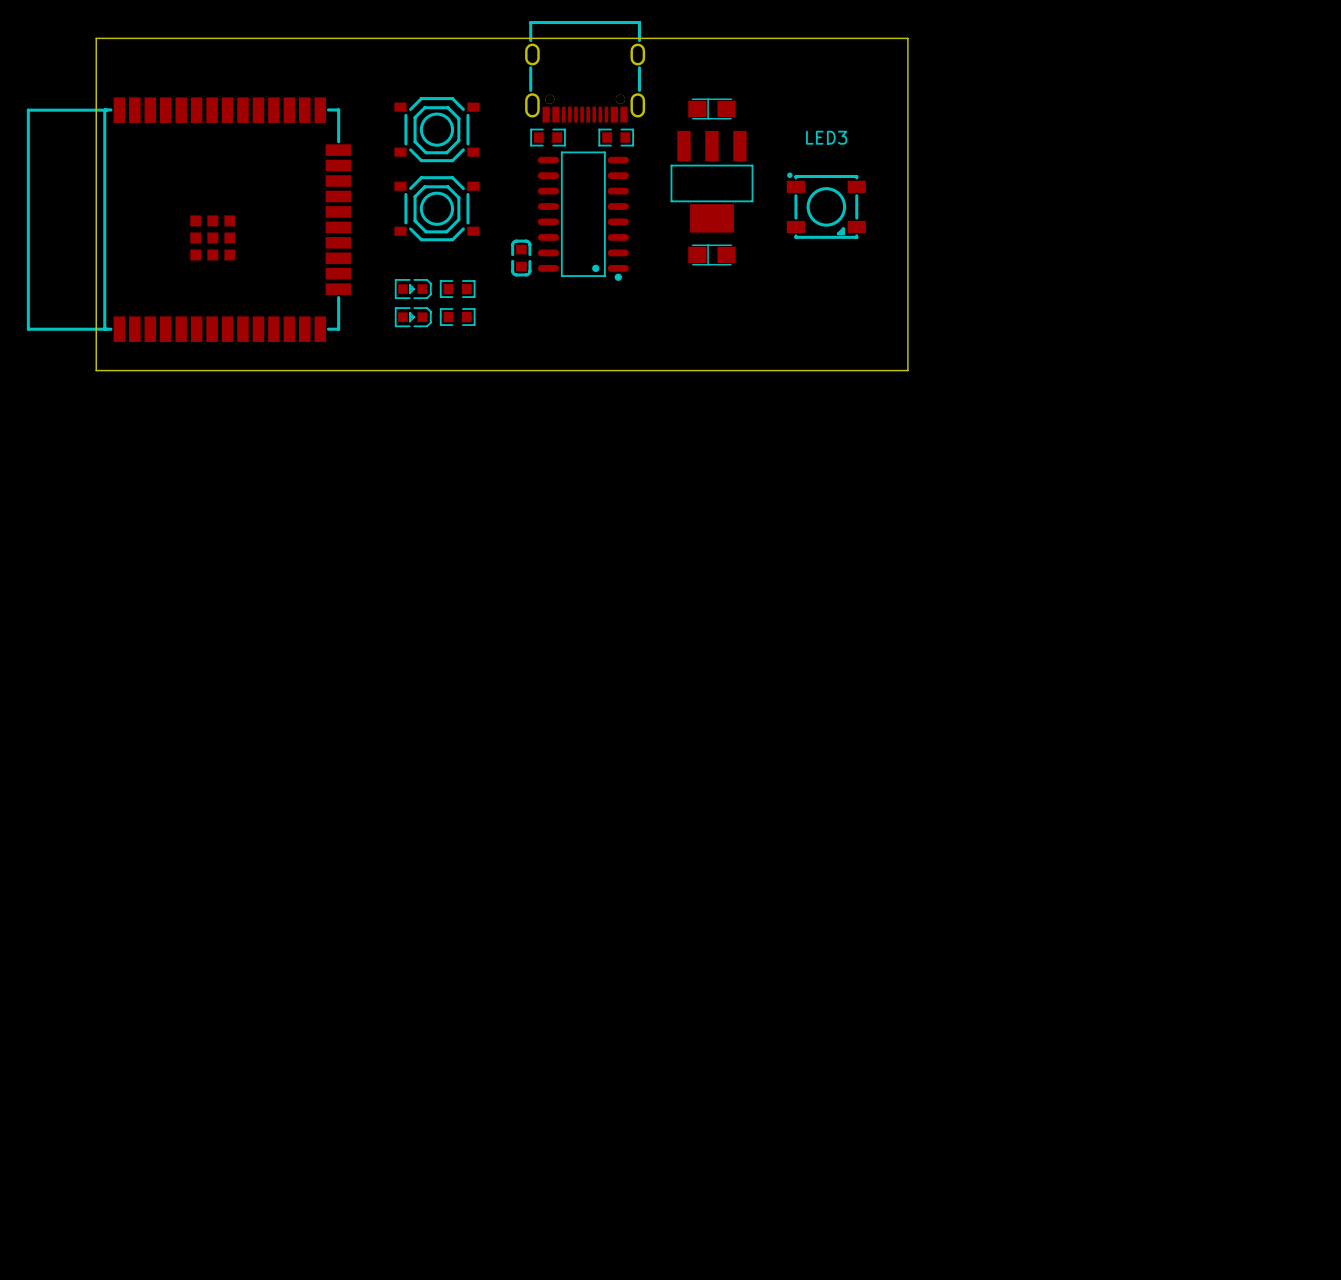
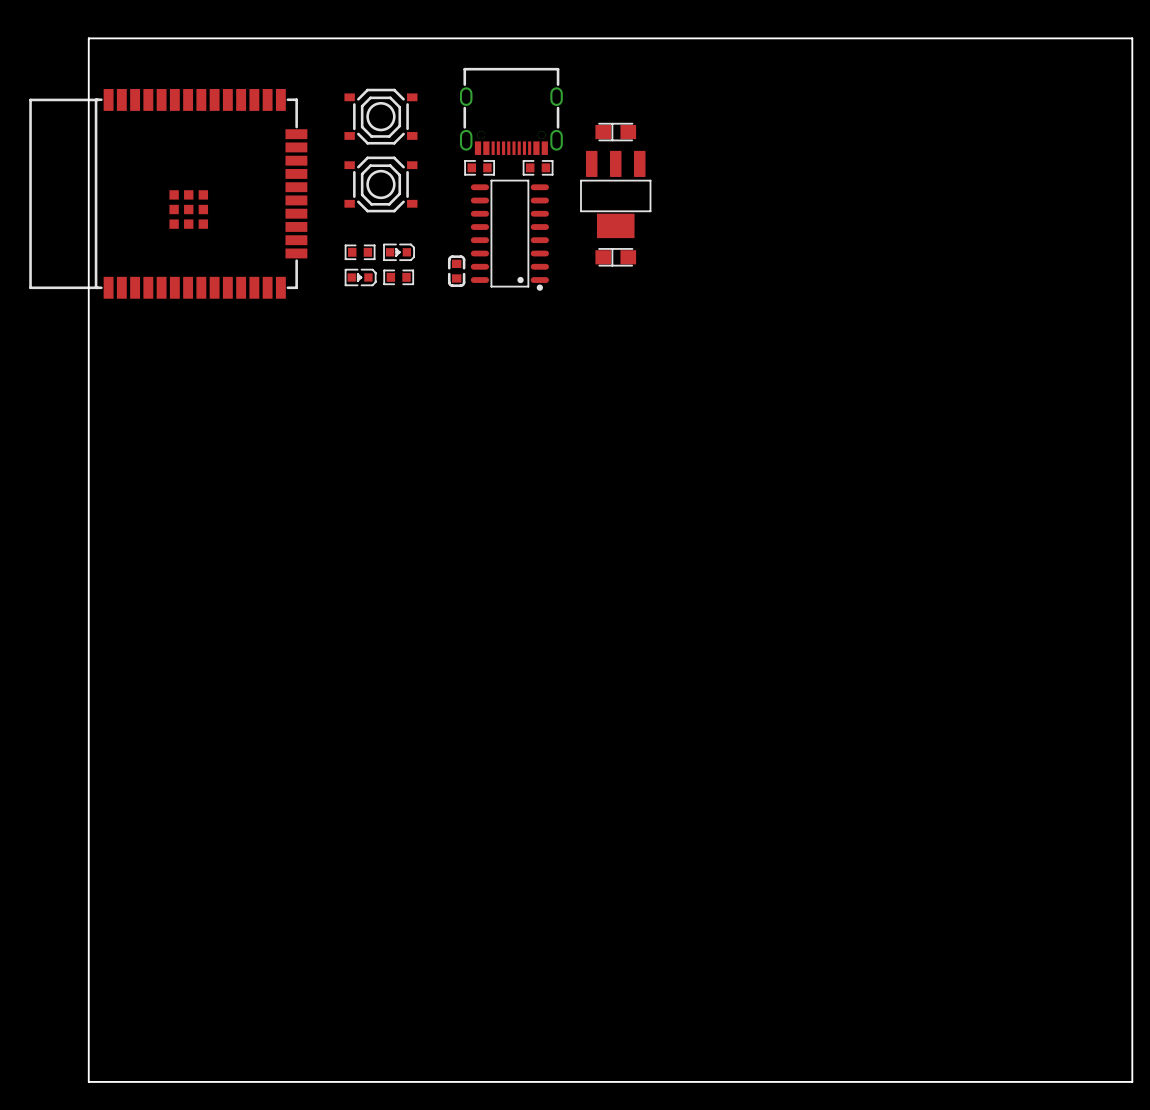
board edge: (907, 38) (907, 370) (96, 370) -> (784, 38) (1132, 38) (1132, 1081) (88, 1081) (88, 323)
part position: (585, 71) -> (511, 111)
part position: (711, 108) -> (615, 132)
part: (548, 137) -> none
part: (616, 137) -> none
part position: (711, 181) -> (615, 194)
part: none -> (479, 167)
part: none -> (538, 167)
LED3: (826, 205) -> none
part position: (583, 216) -> (509, 235)
part position: (711, 254) -> (615, 257)
part position: (521, 258) -> (456, 271)
part footprint: [394, 279, 432, 300] -> [344, 244, 376, 260]
part footprint: [439, 280, 476, 298] -> [383, 243, 415, 261]

